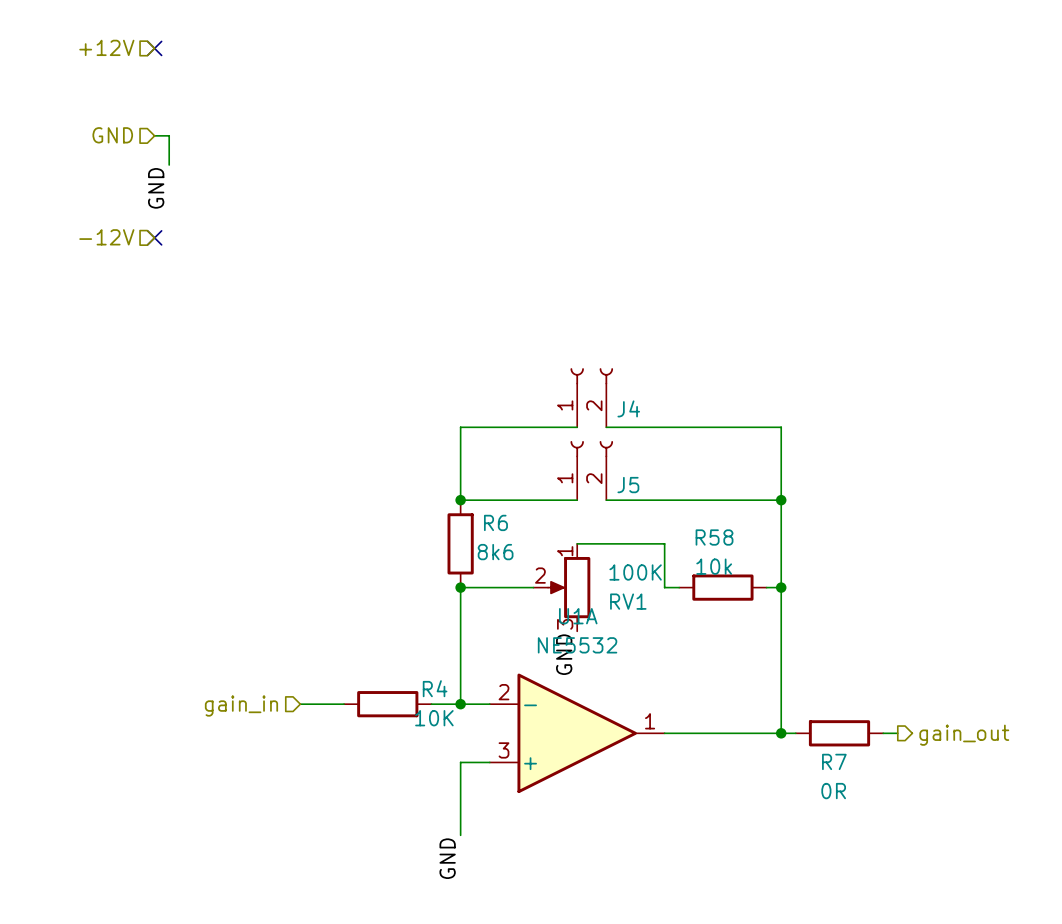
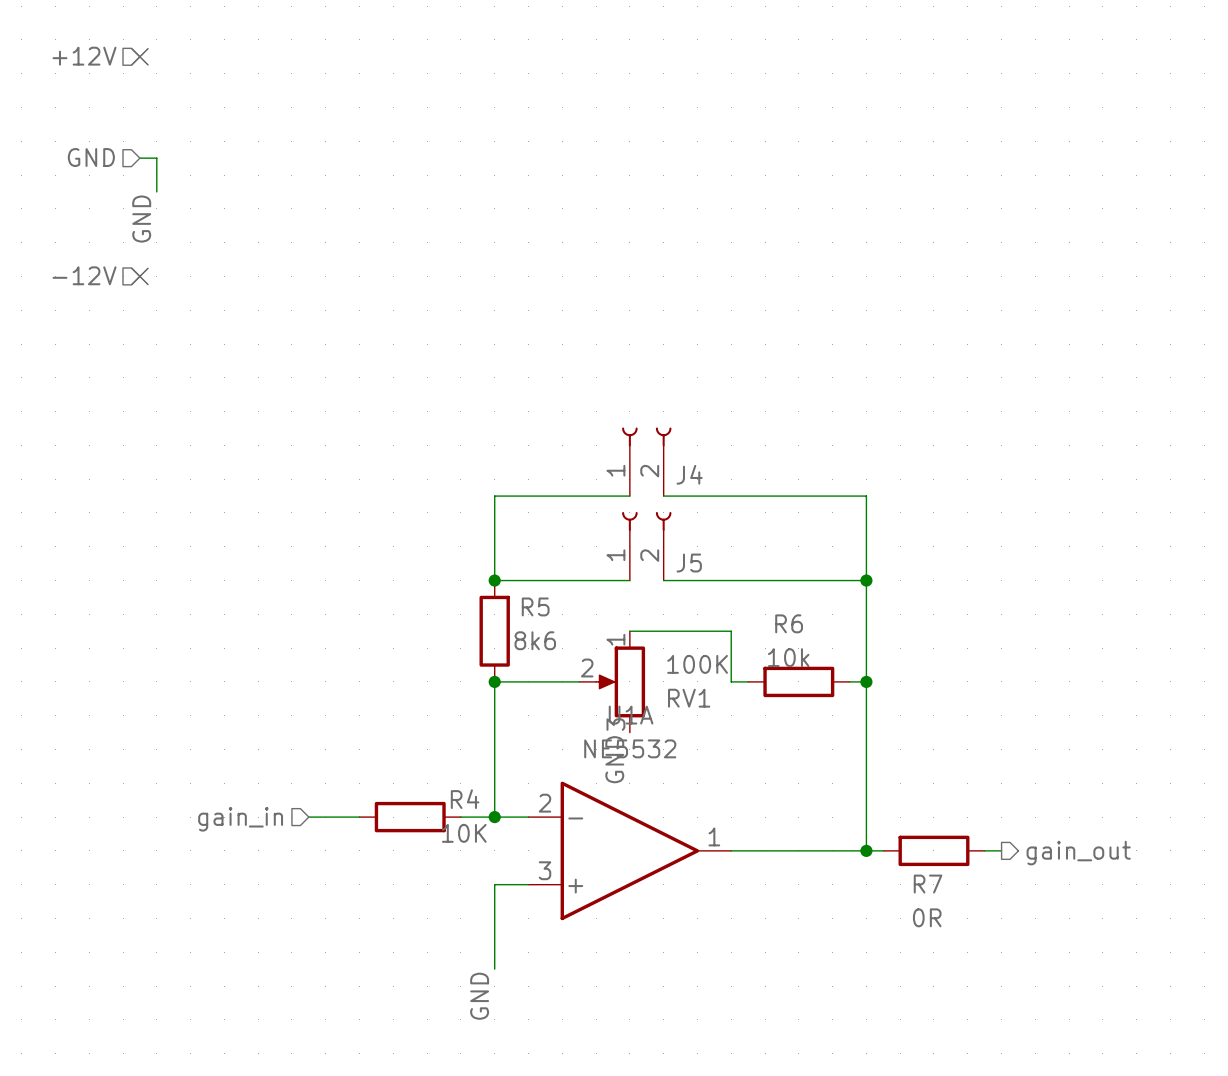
R6 name: R6 (495, 522) -> R5 (535, 606)
R58 name: R58 (714, 537) -> R6 (789, 623)

